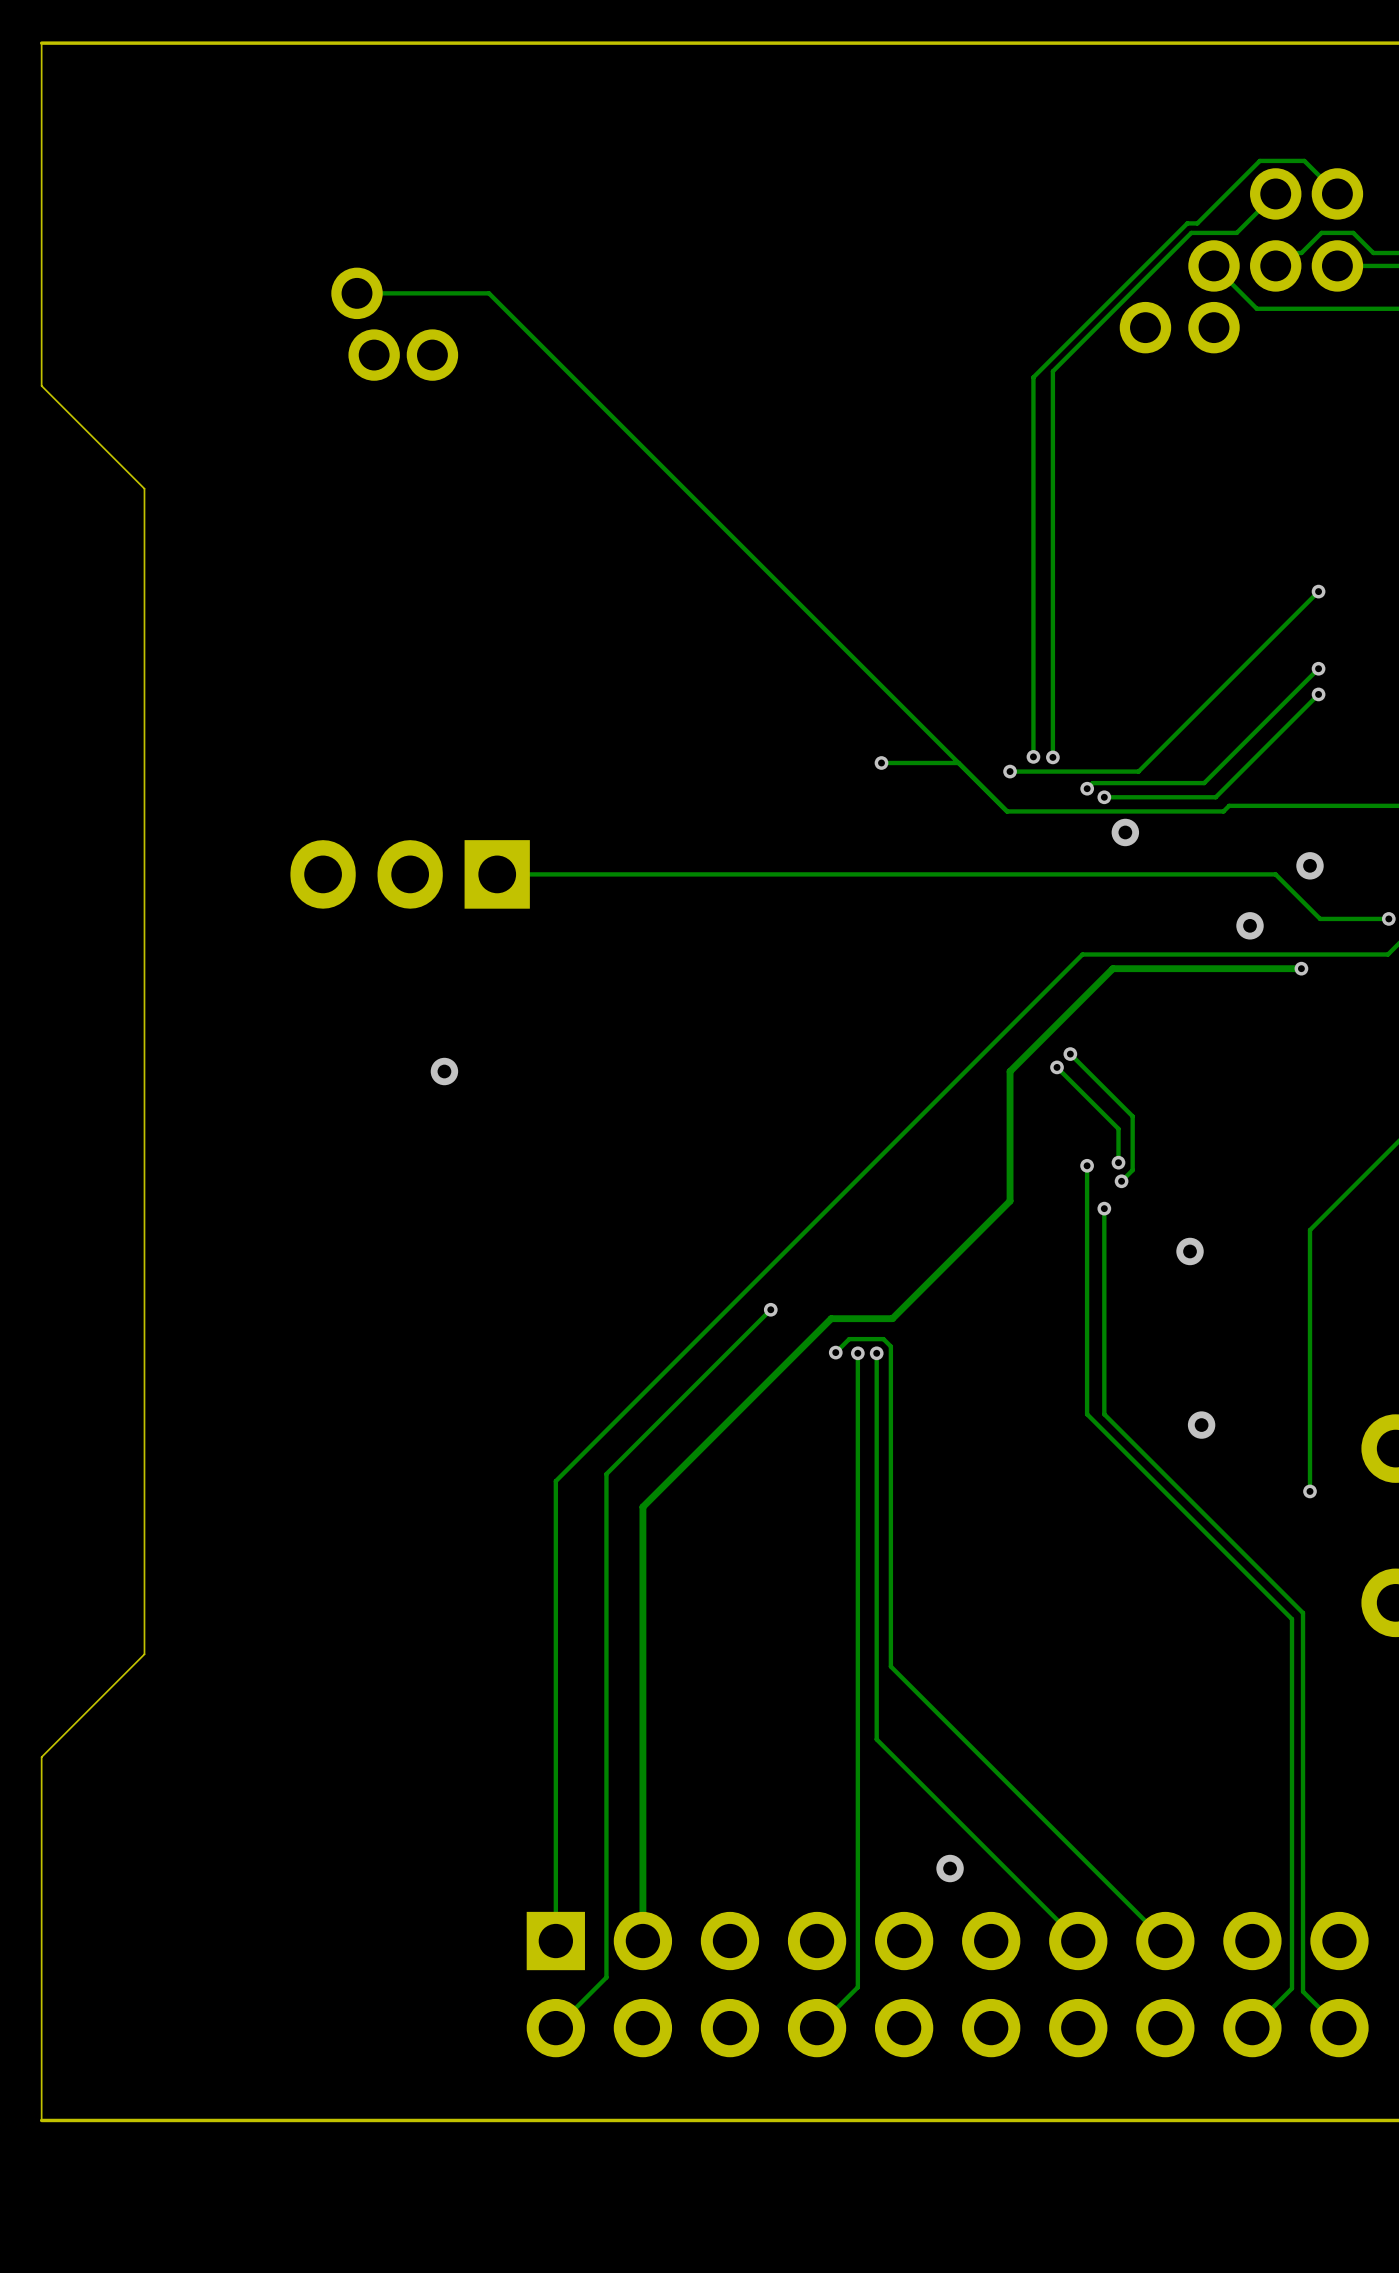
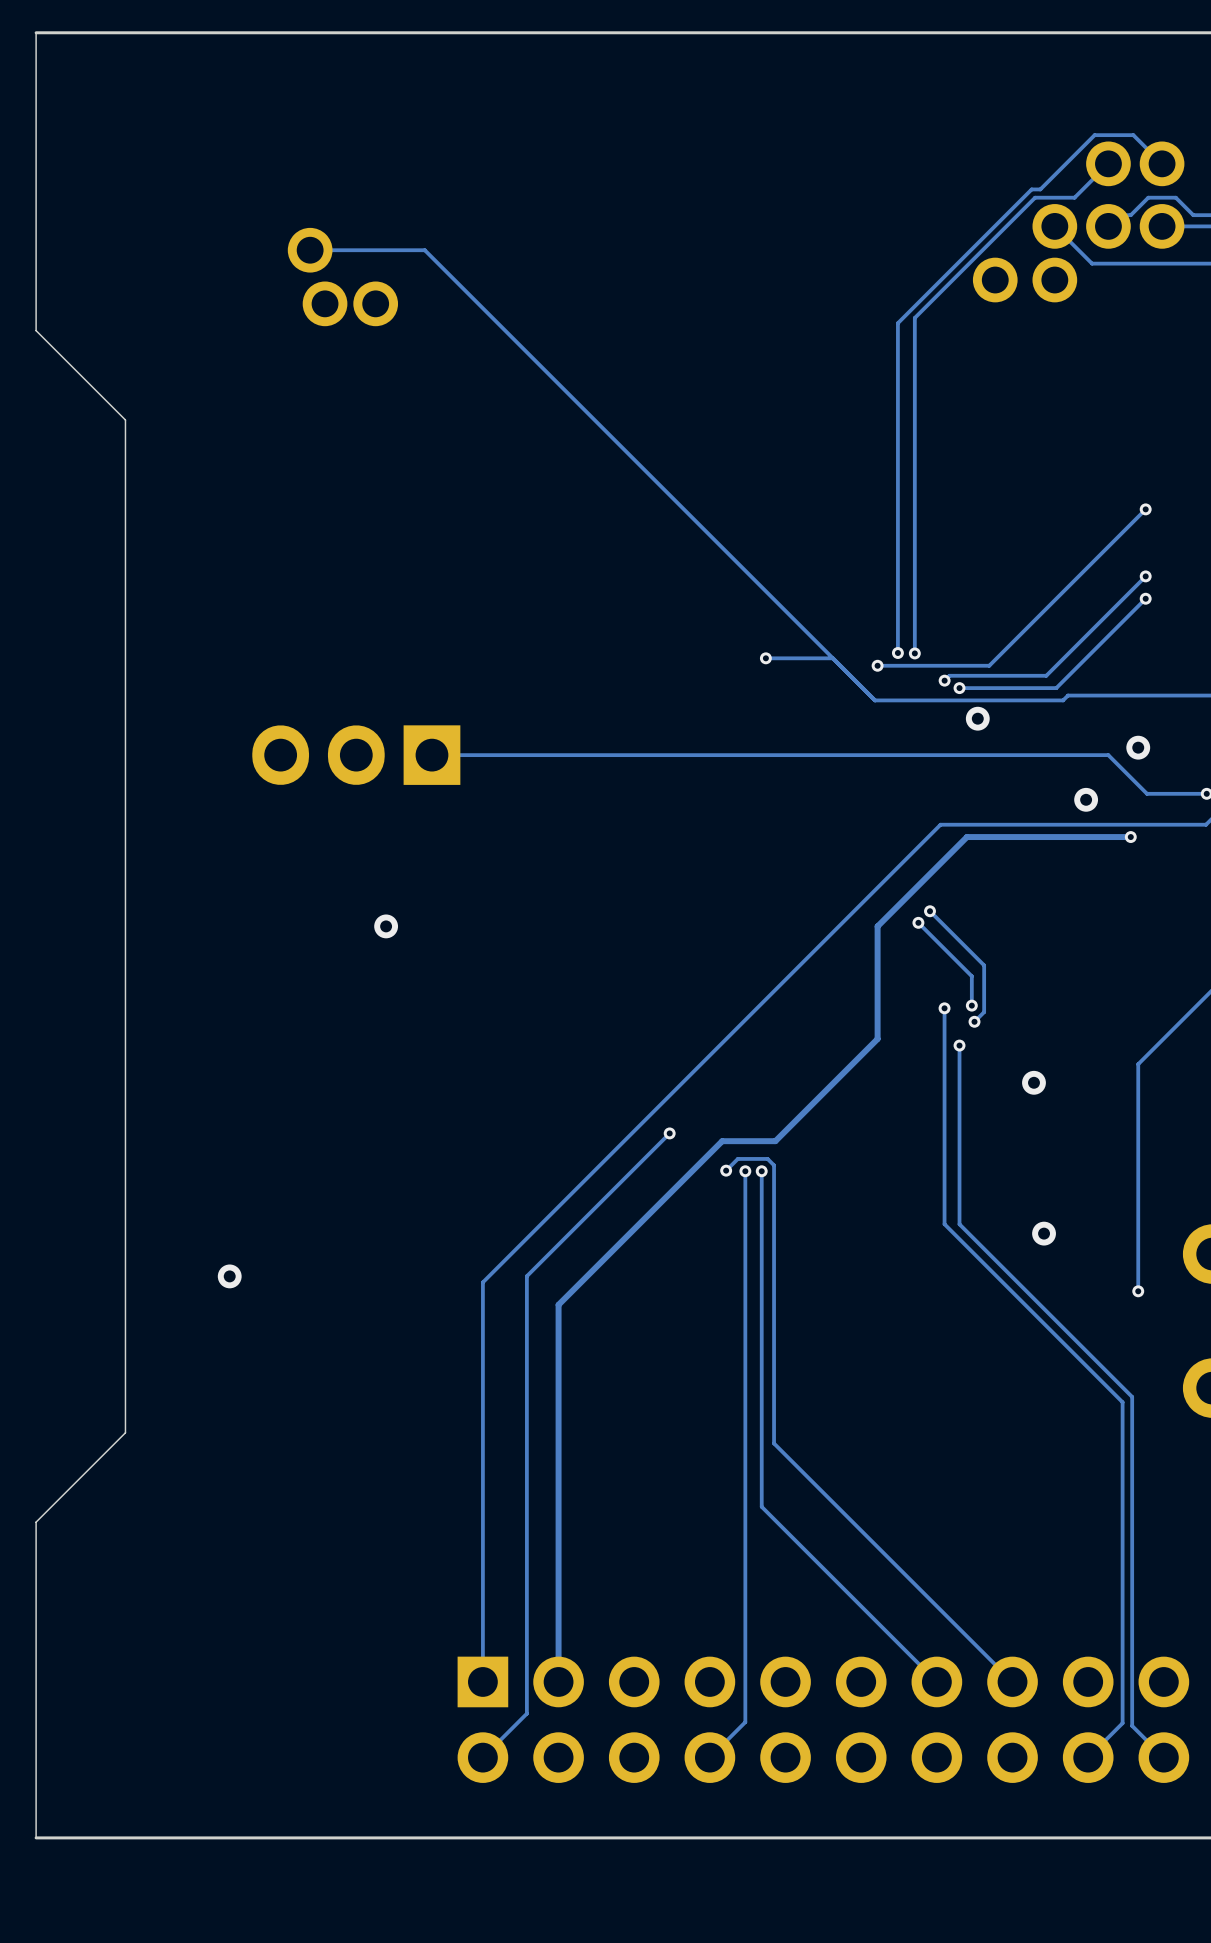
via: none -> (229, 1276)
via: (950, 1868) -> none

